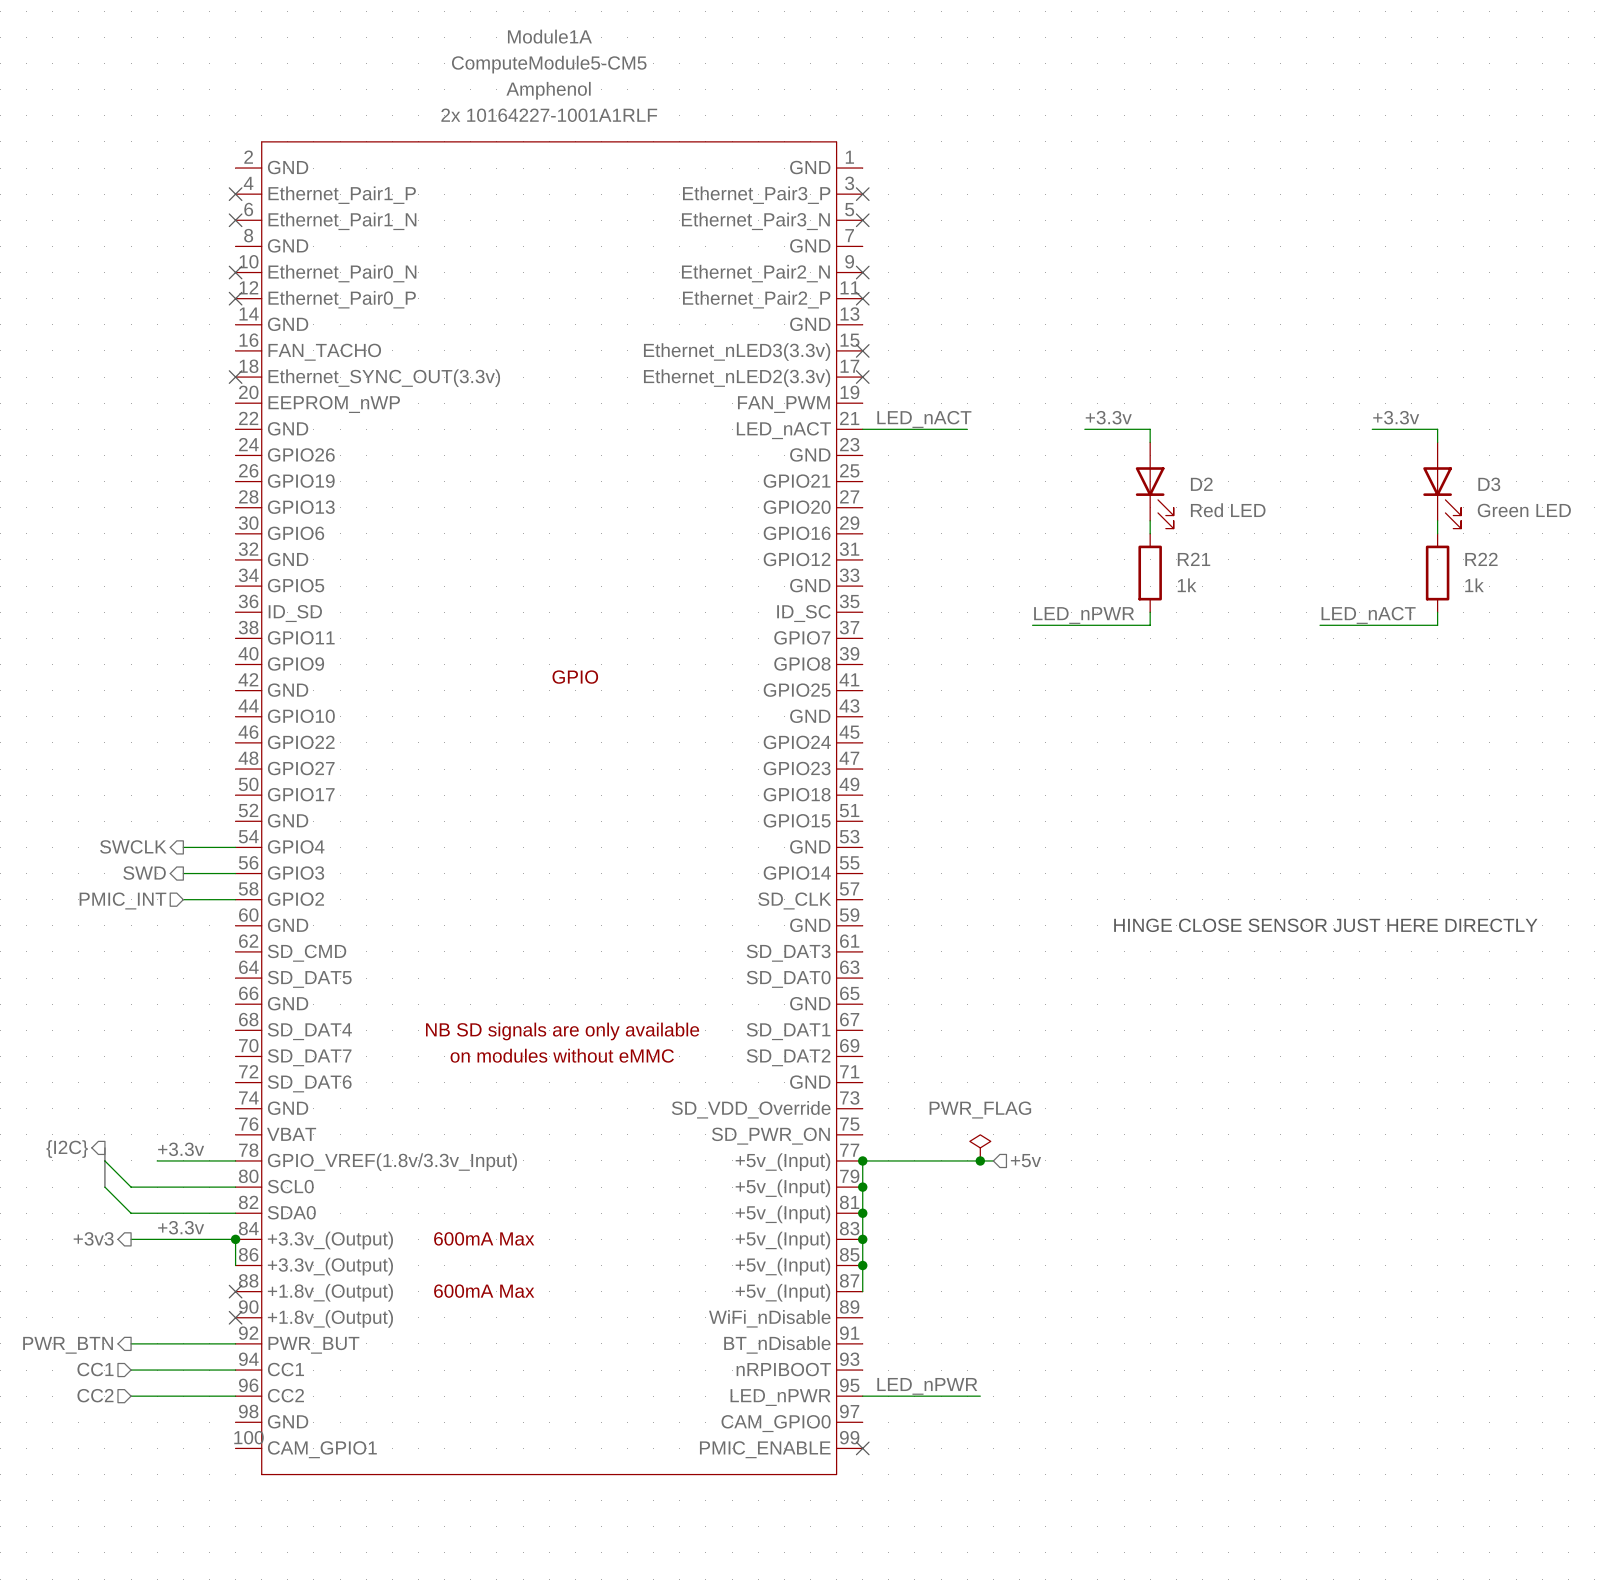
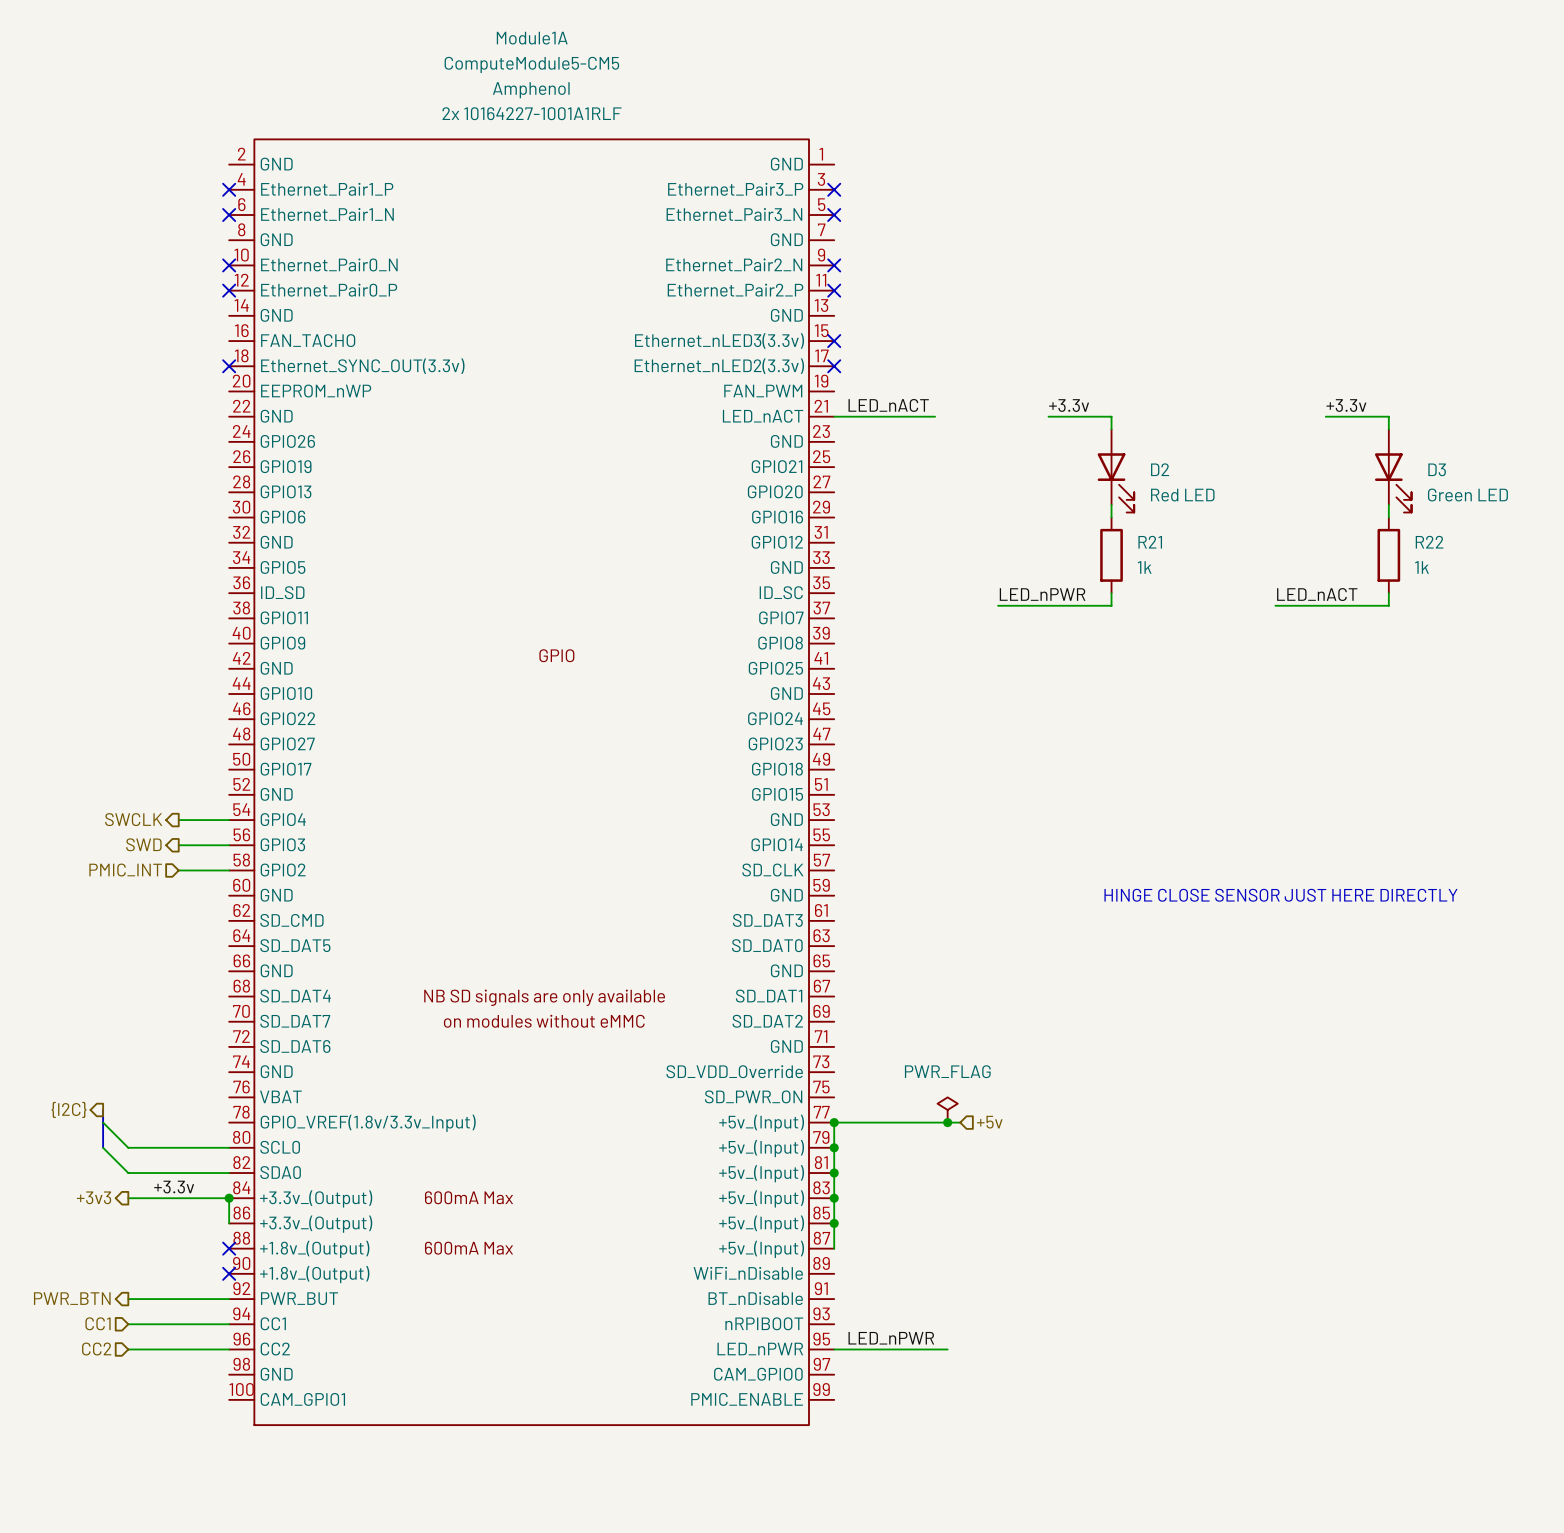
label: +3.3v (181, 1149) -> none
wire: (157, 1160) (235, 1160) -> none
no-connect mark: (862, 1448) -> none

